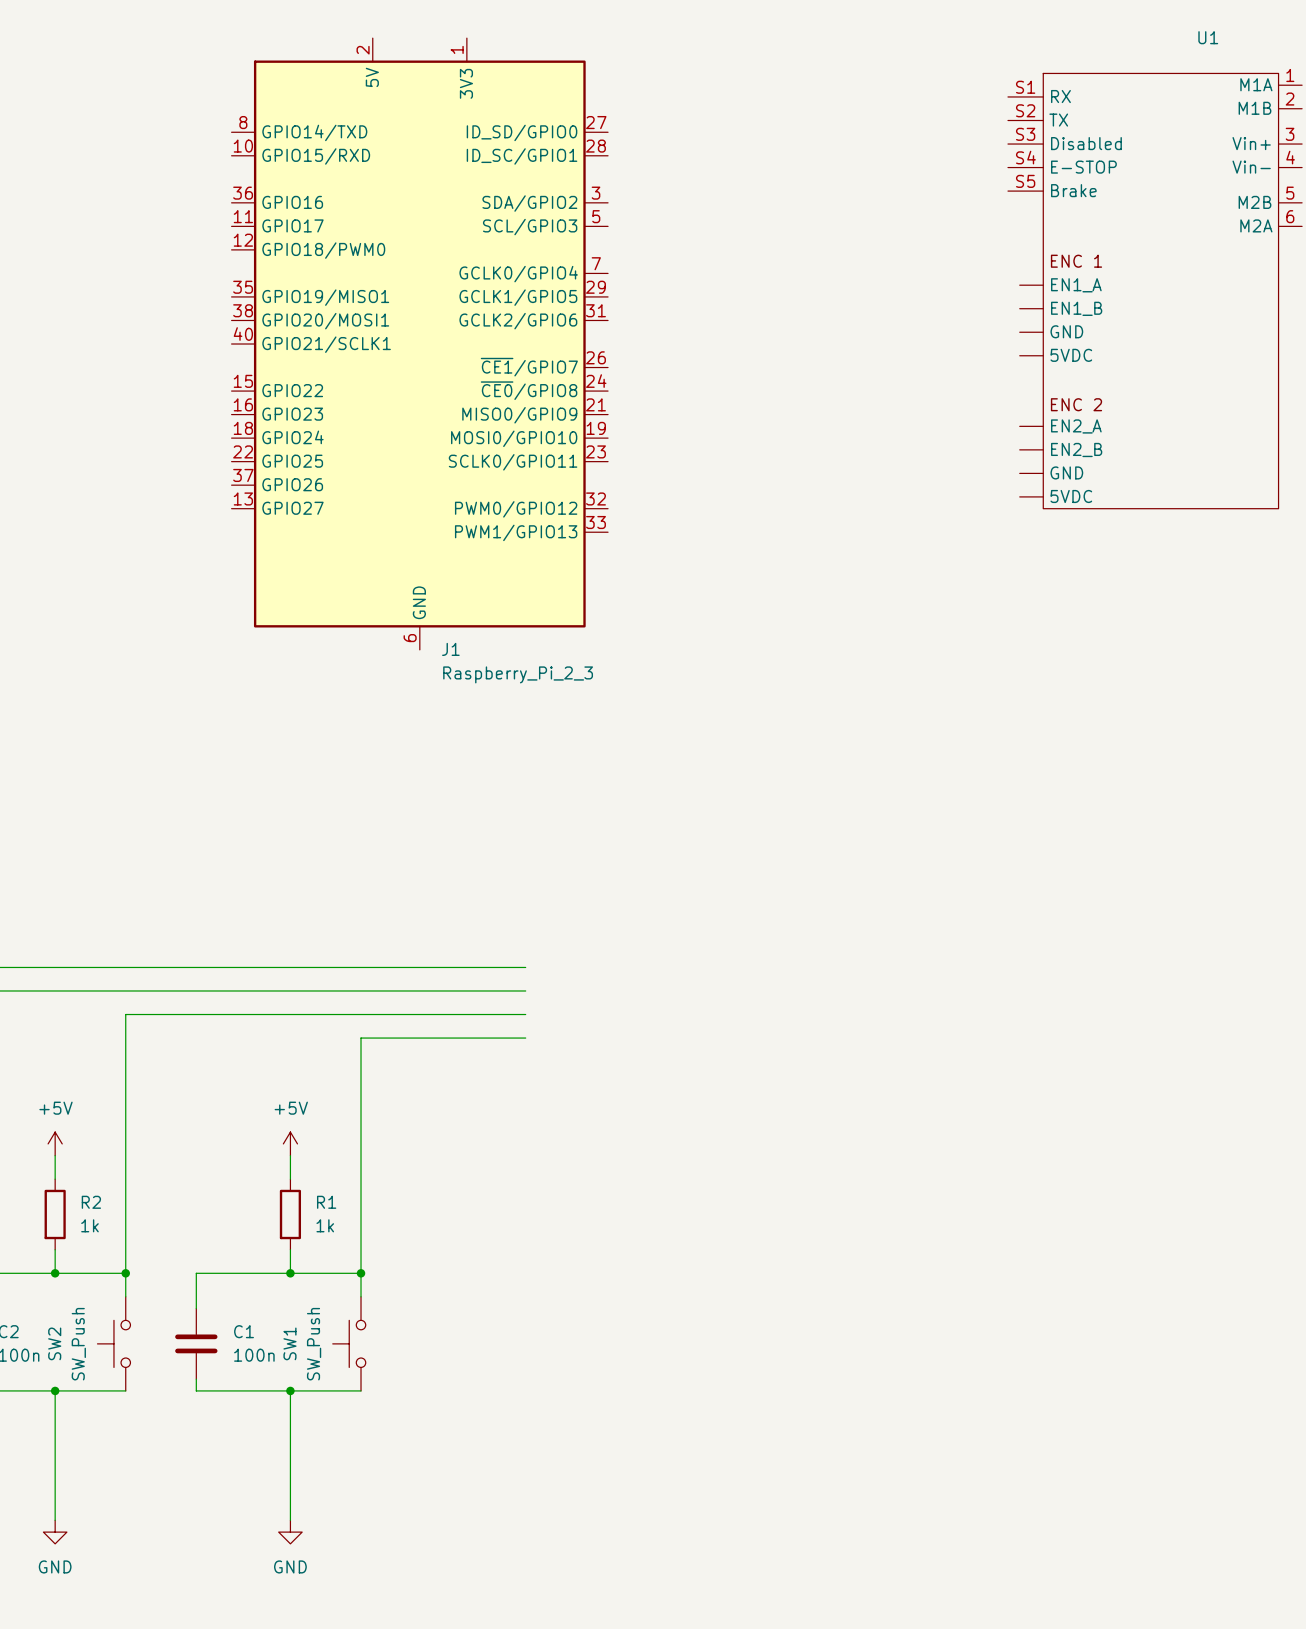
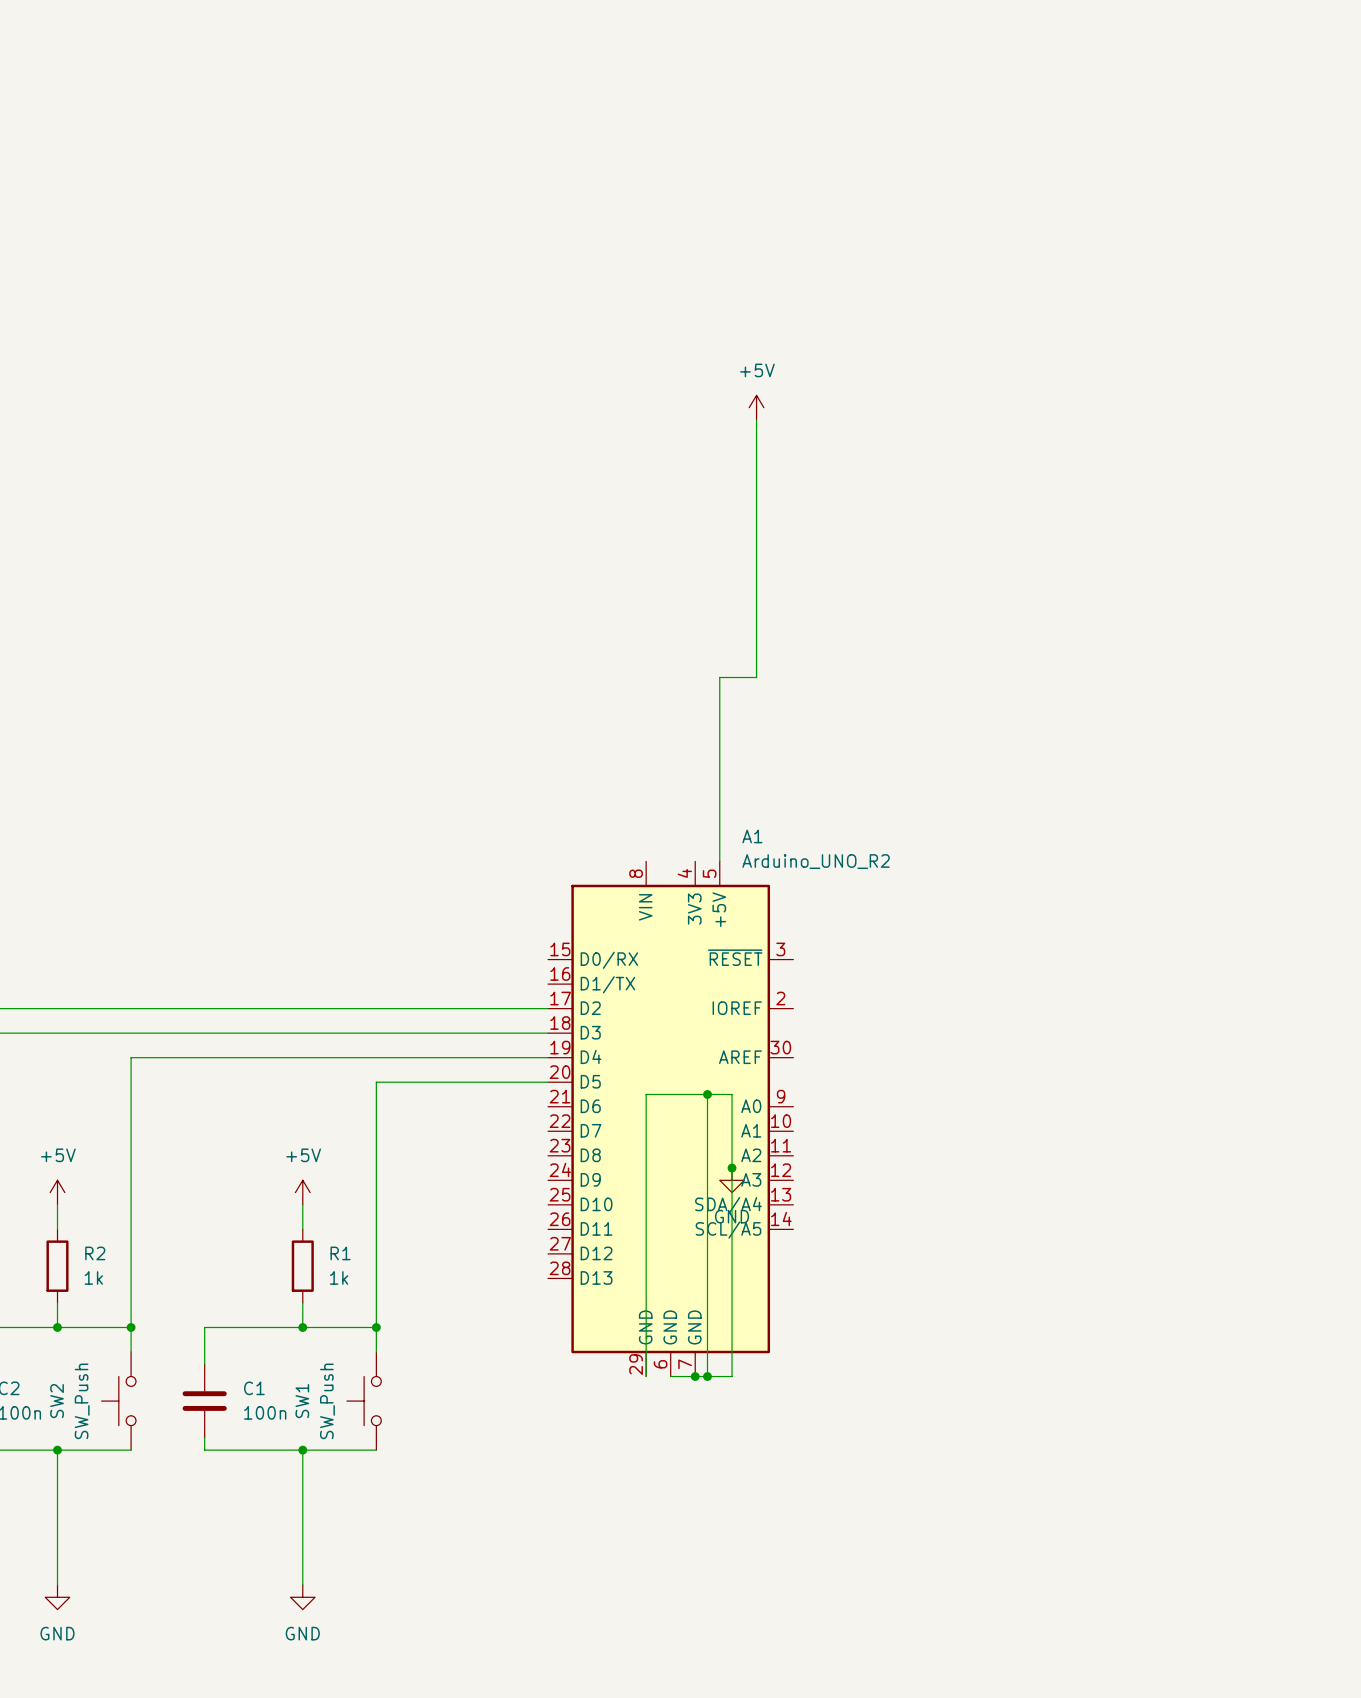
U1: (1155, 291) -> none
J1: Raspberry_Pi_2_3 (419, 344) -> none
power symbol: none -> +5V (756, 407)
wire: none -> (756, 419) (756, 677) (719, 677) (719, 861)
wire: none -> (707, 1094) (707, 1376)
junction: none -> (707, 1094)
A1: none -> Arduino_UNO_R2 (670, 1119)
junction: none -> (732, 1168)
power symbol: none -> GND (732, 1180)
wire: none -> (646, 1376) (646, 1094) (732, 1094) (732, 1376) (670, 1376)
junction: none -> (695, 1376)
junction: none -> (707, 1376)

